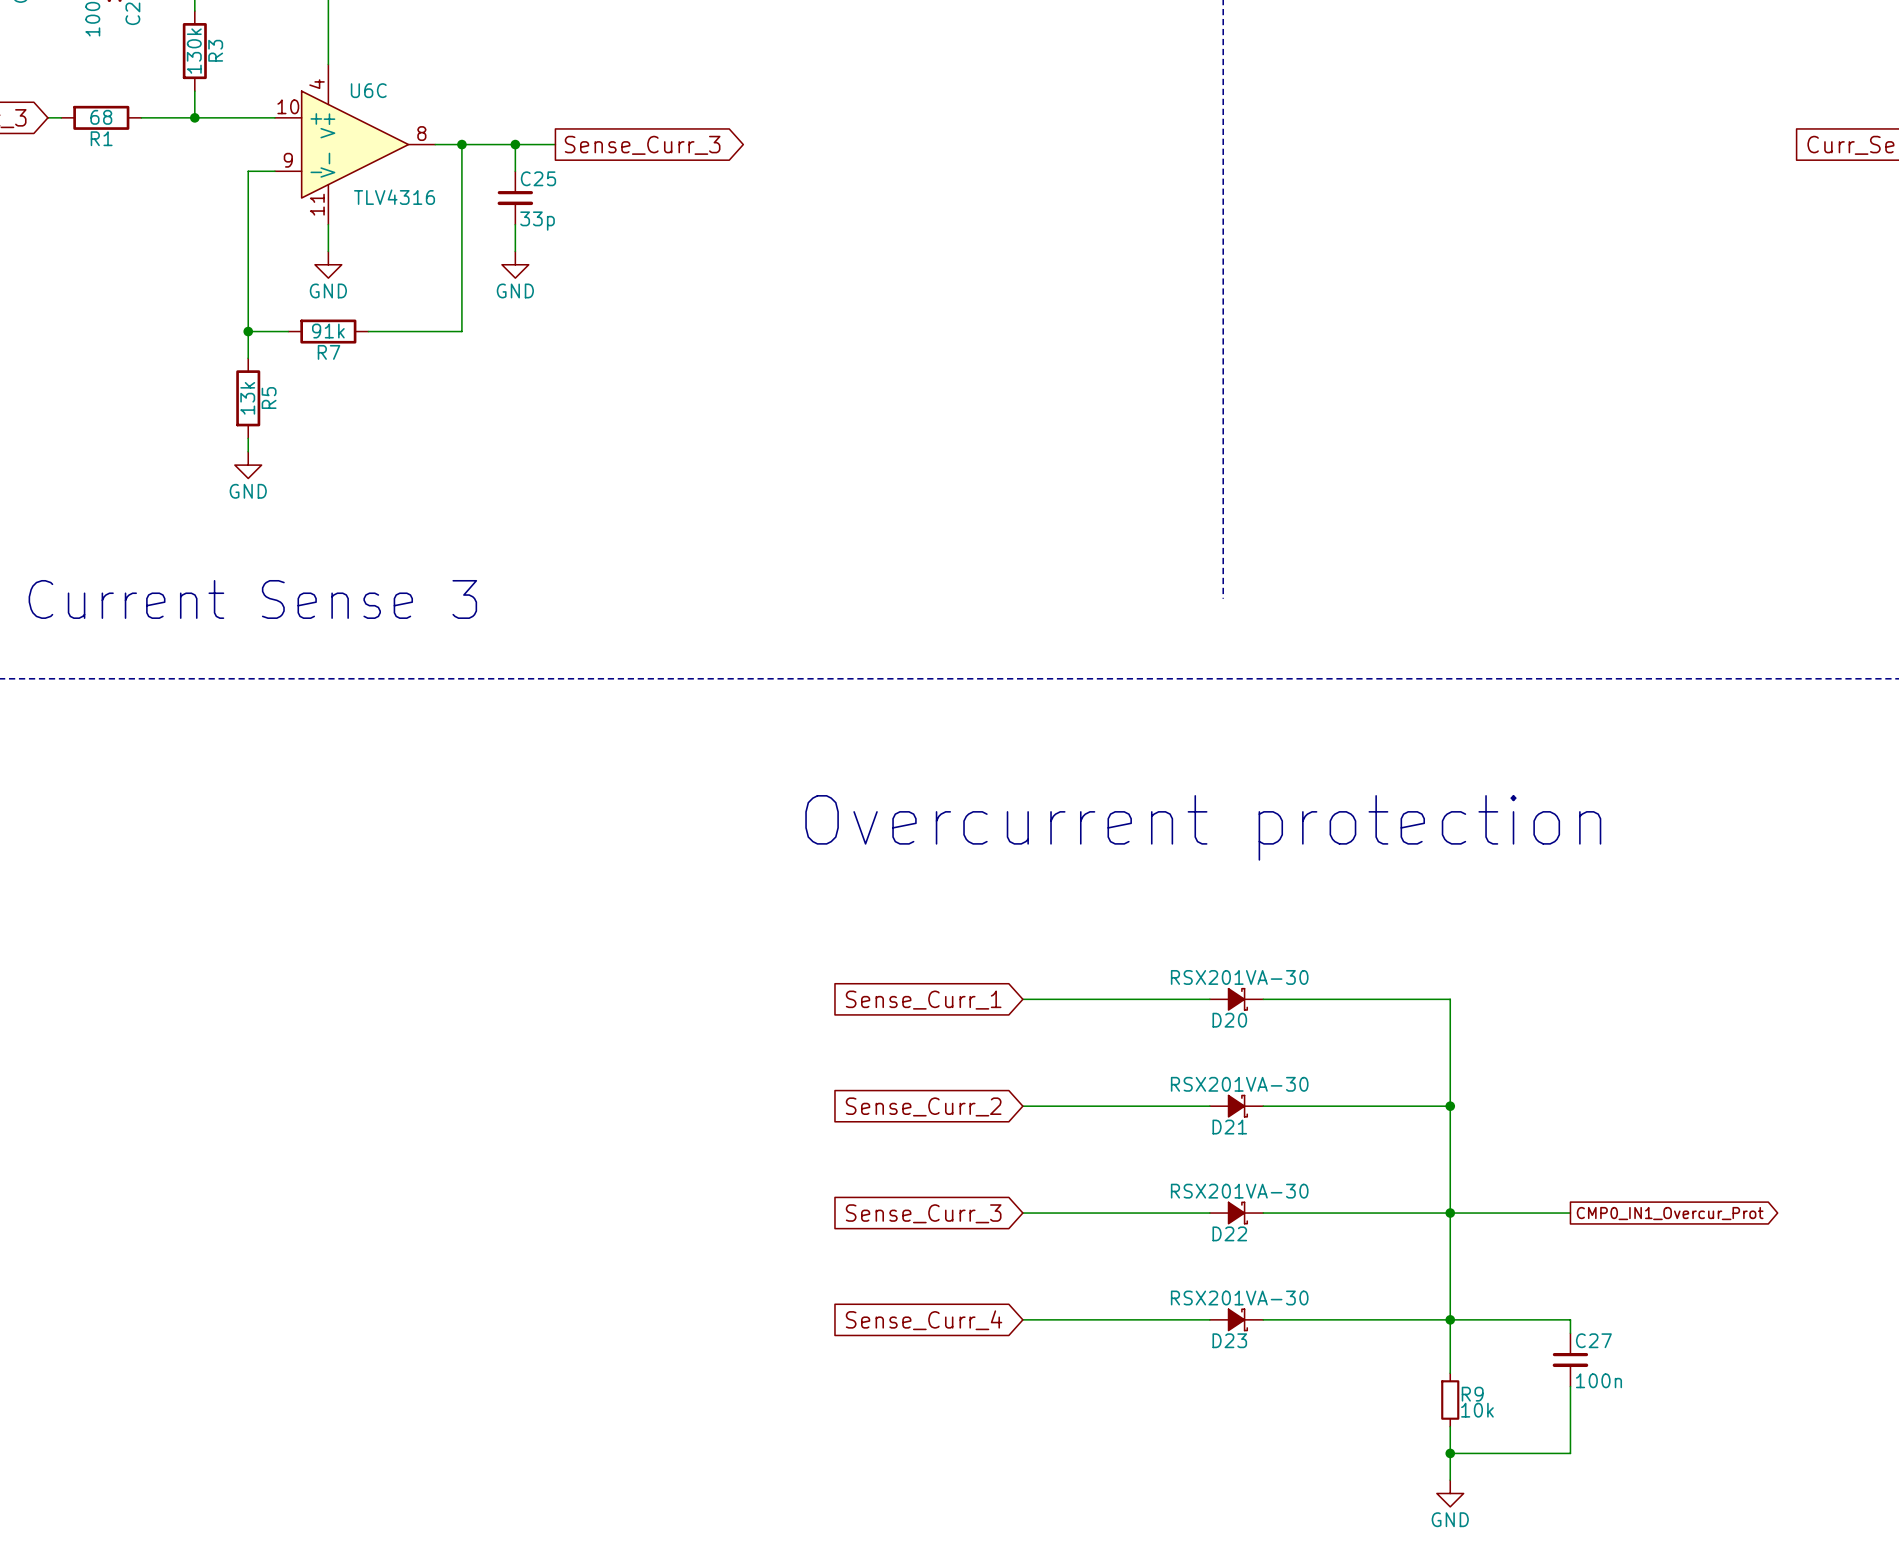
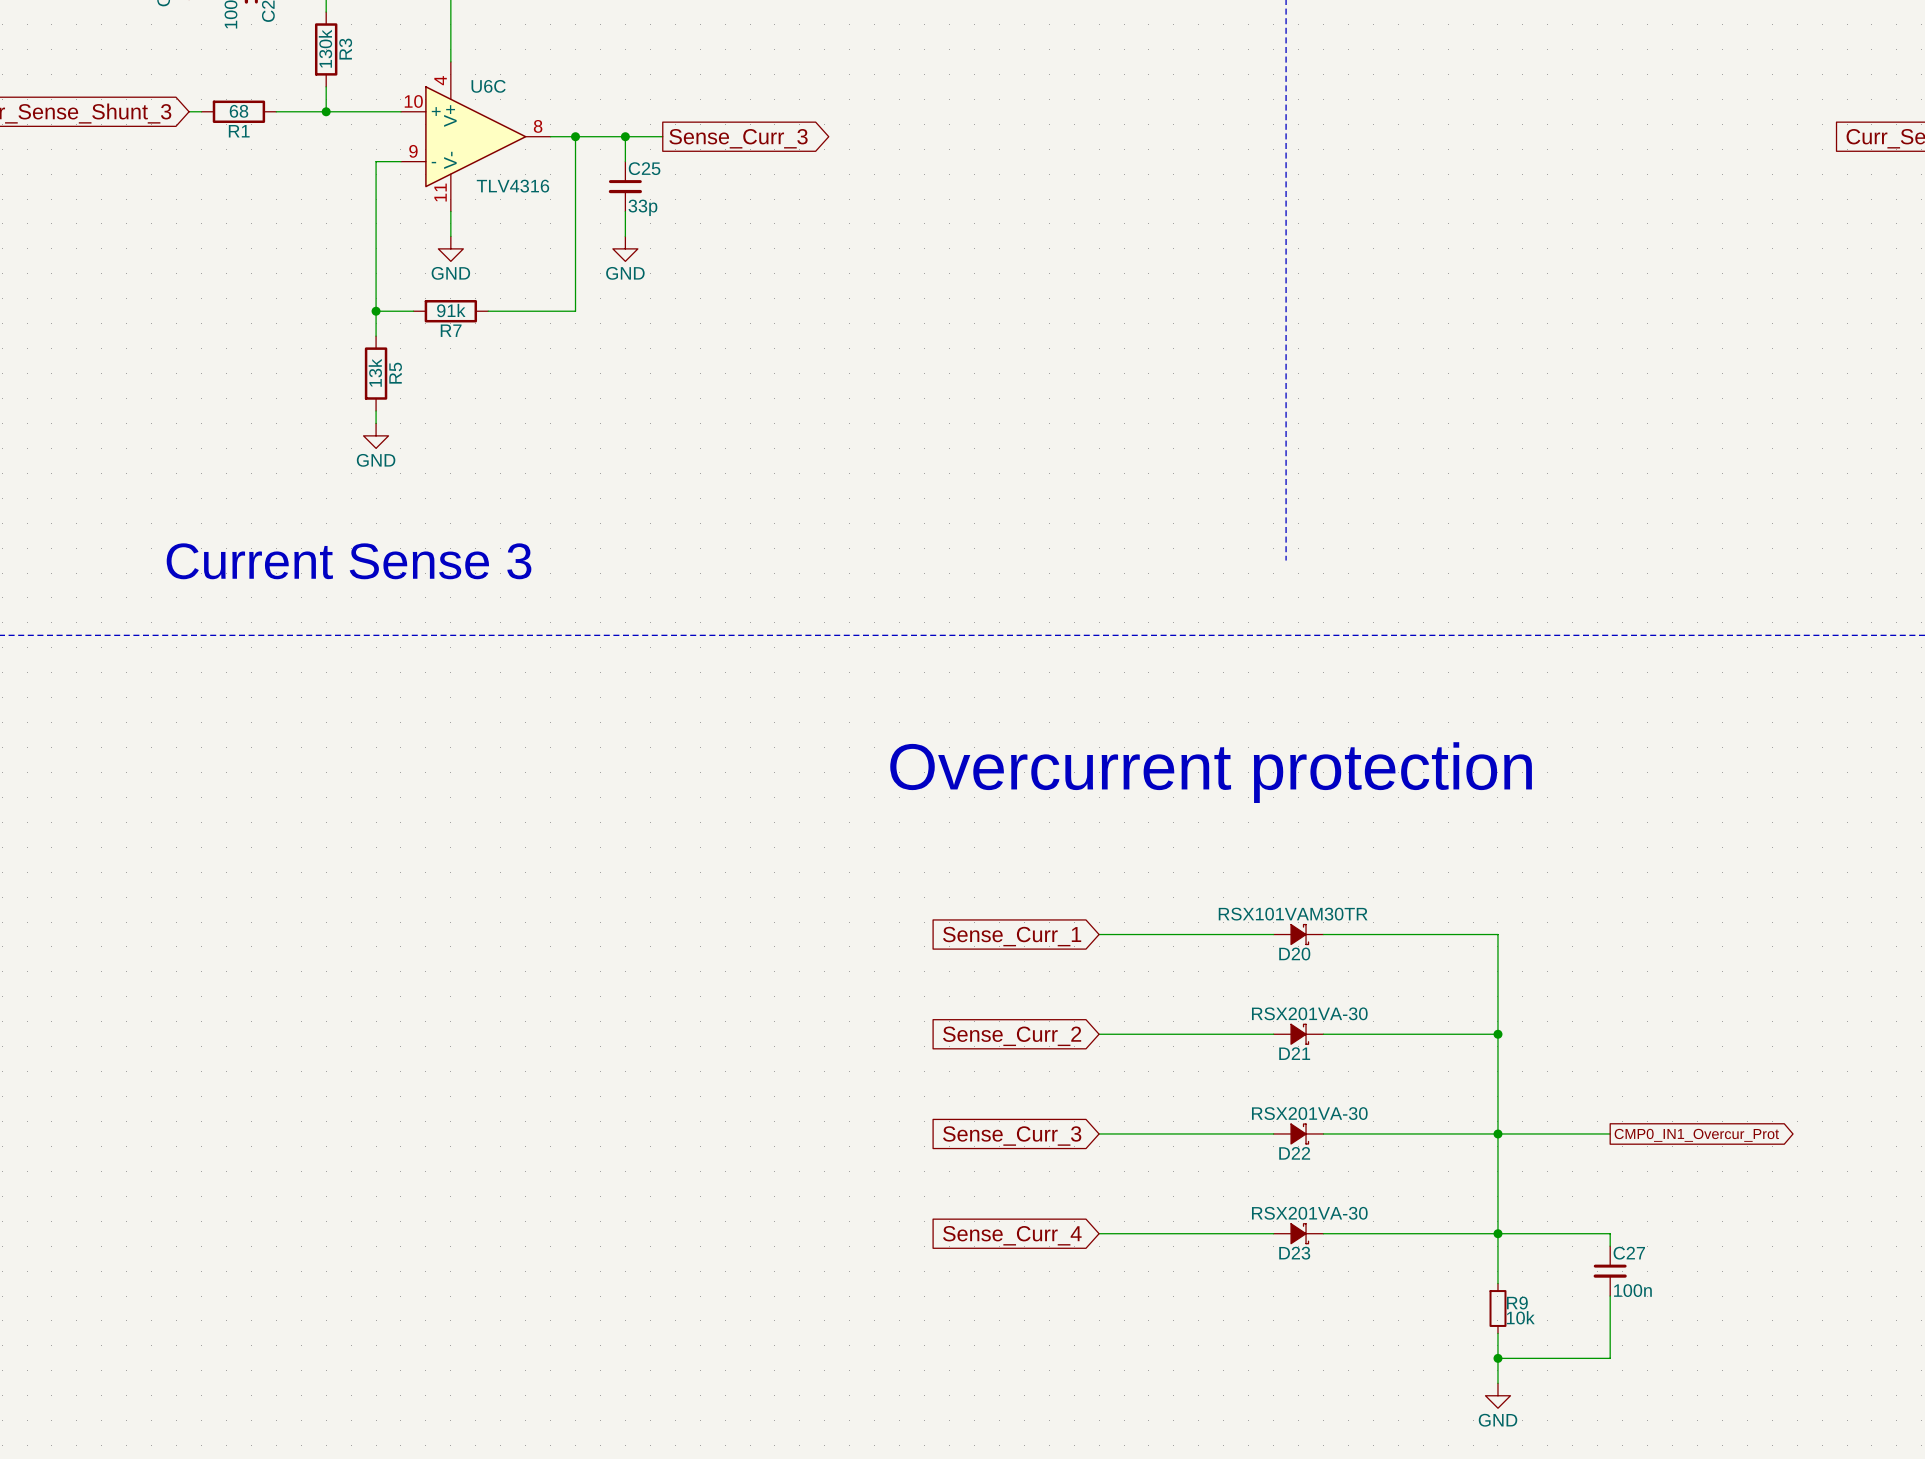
D20 value: RSX201VA-30 (1239, 977) -> RSX101VAM30TR (1293, 914)

